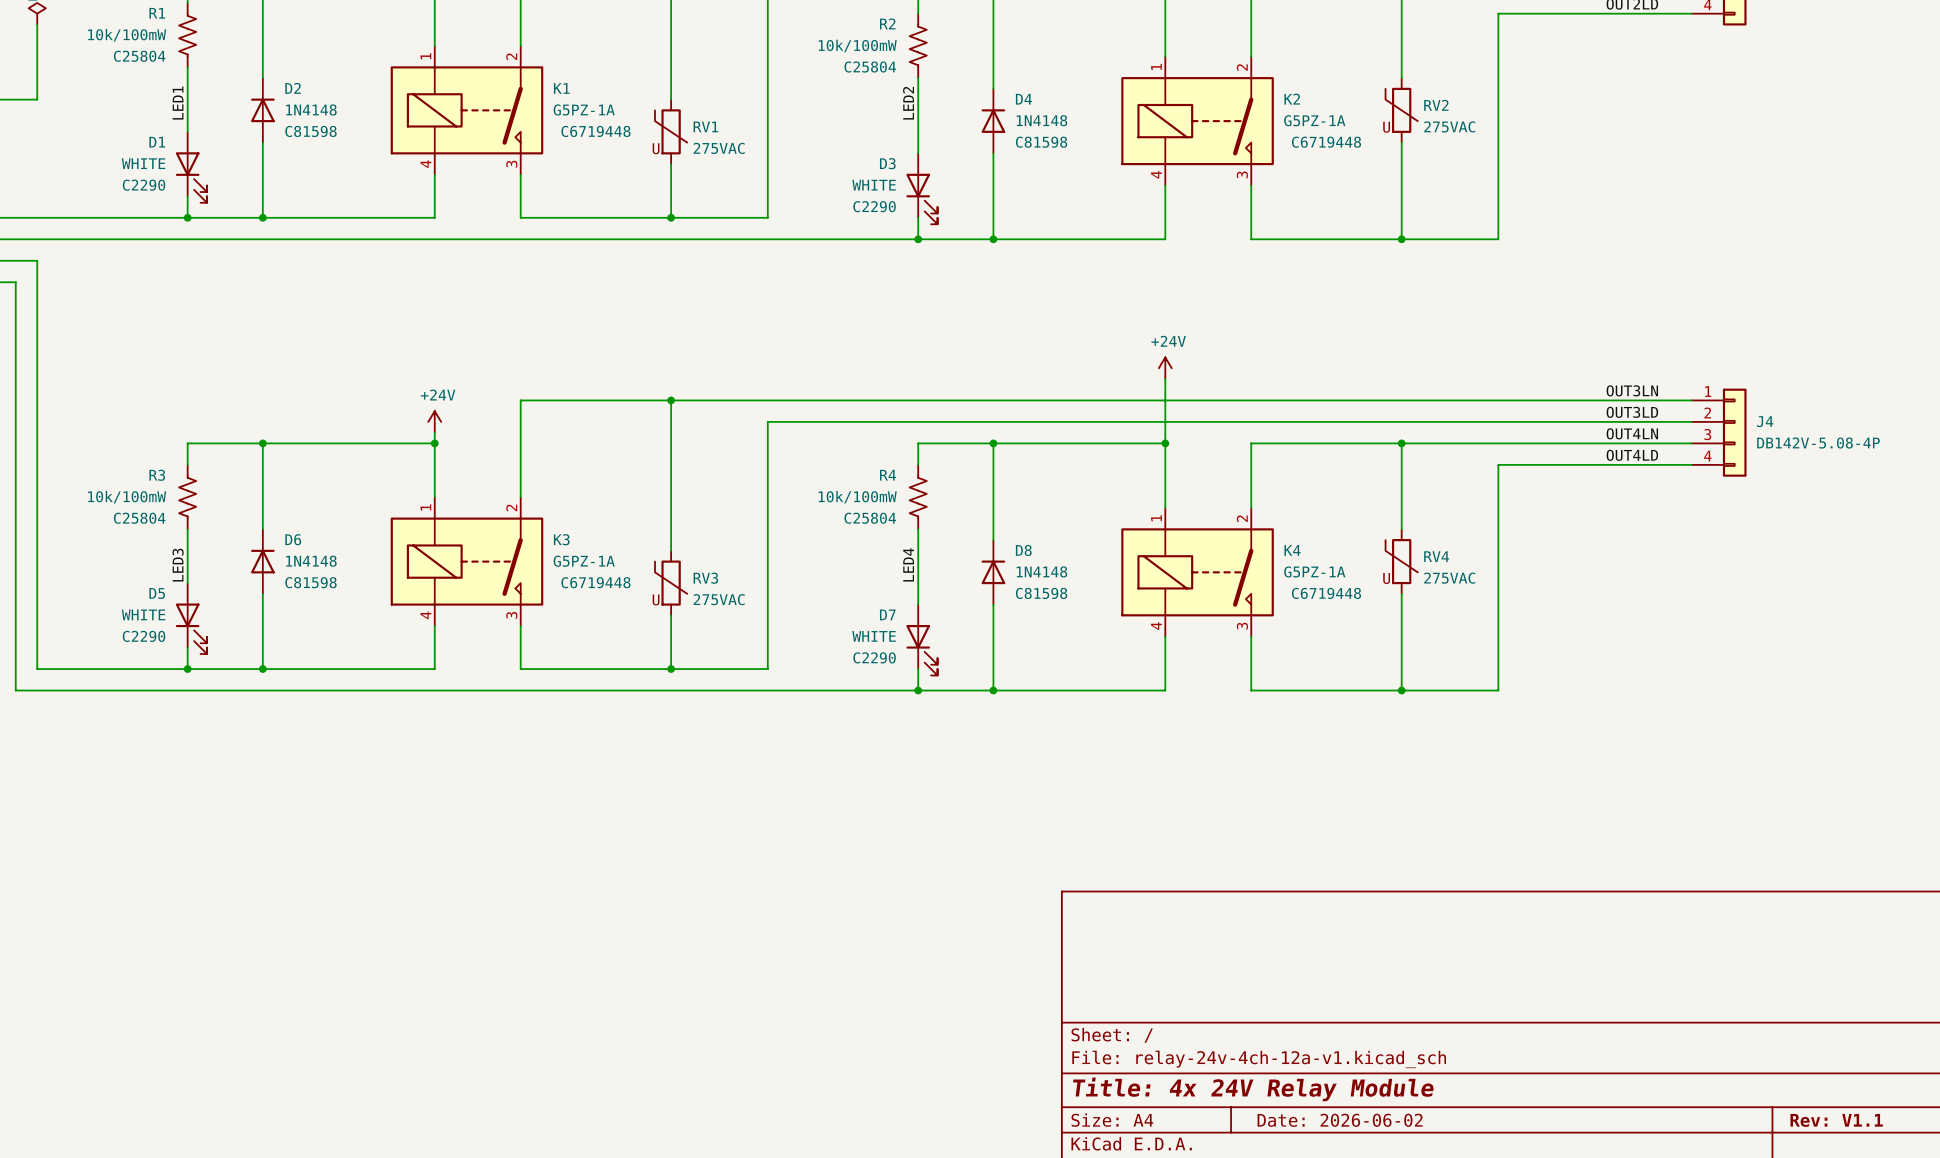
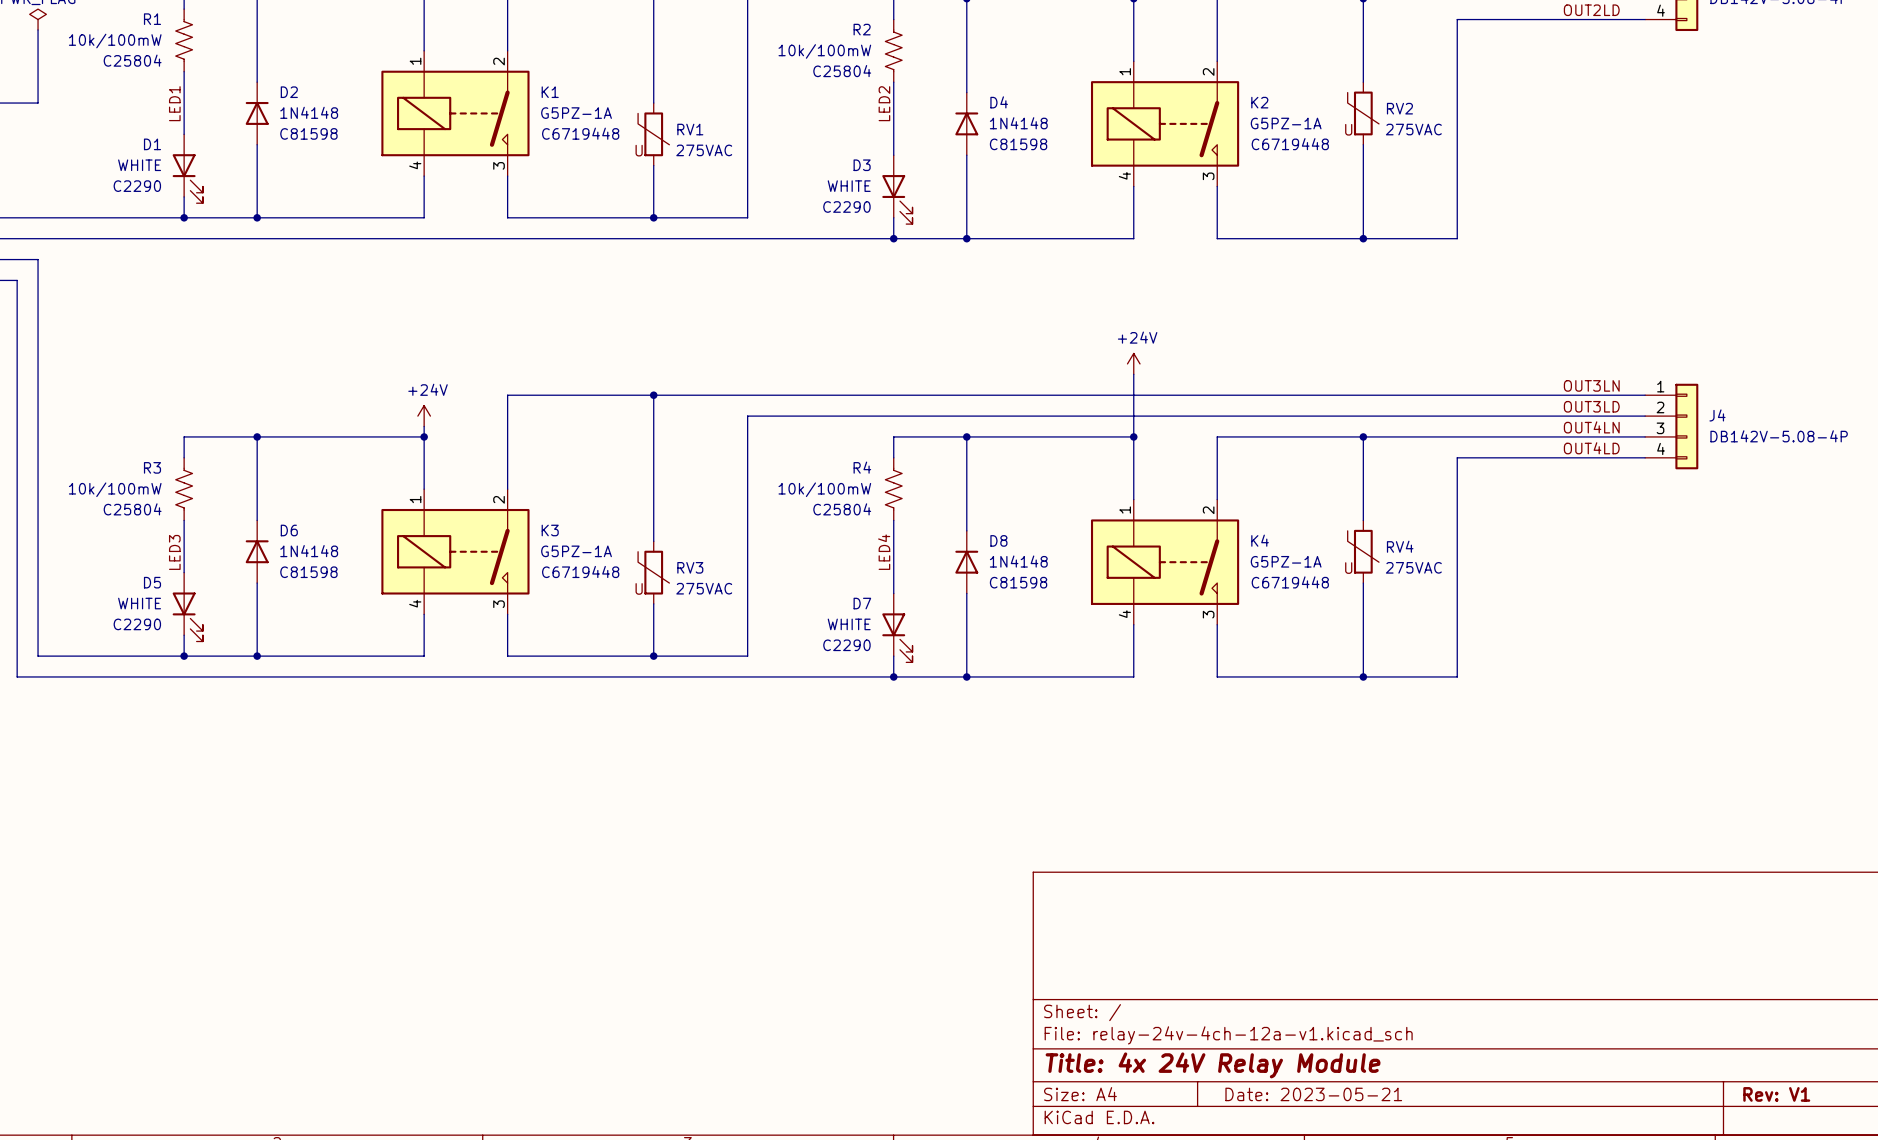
title block: Date: 2026-06-02 (1340, 1120) -> Date: 2023-05-21 (1313, 1094)
title block: Rev: V1.1 (1836, 1120) -> Rev: V1 (1776, 1094)

